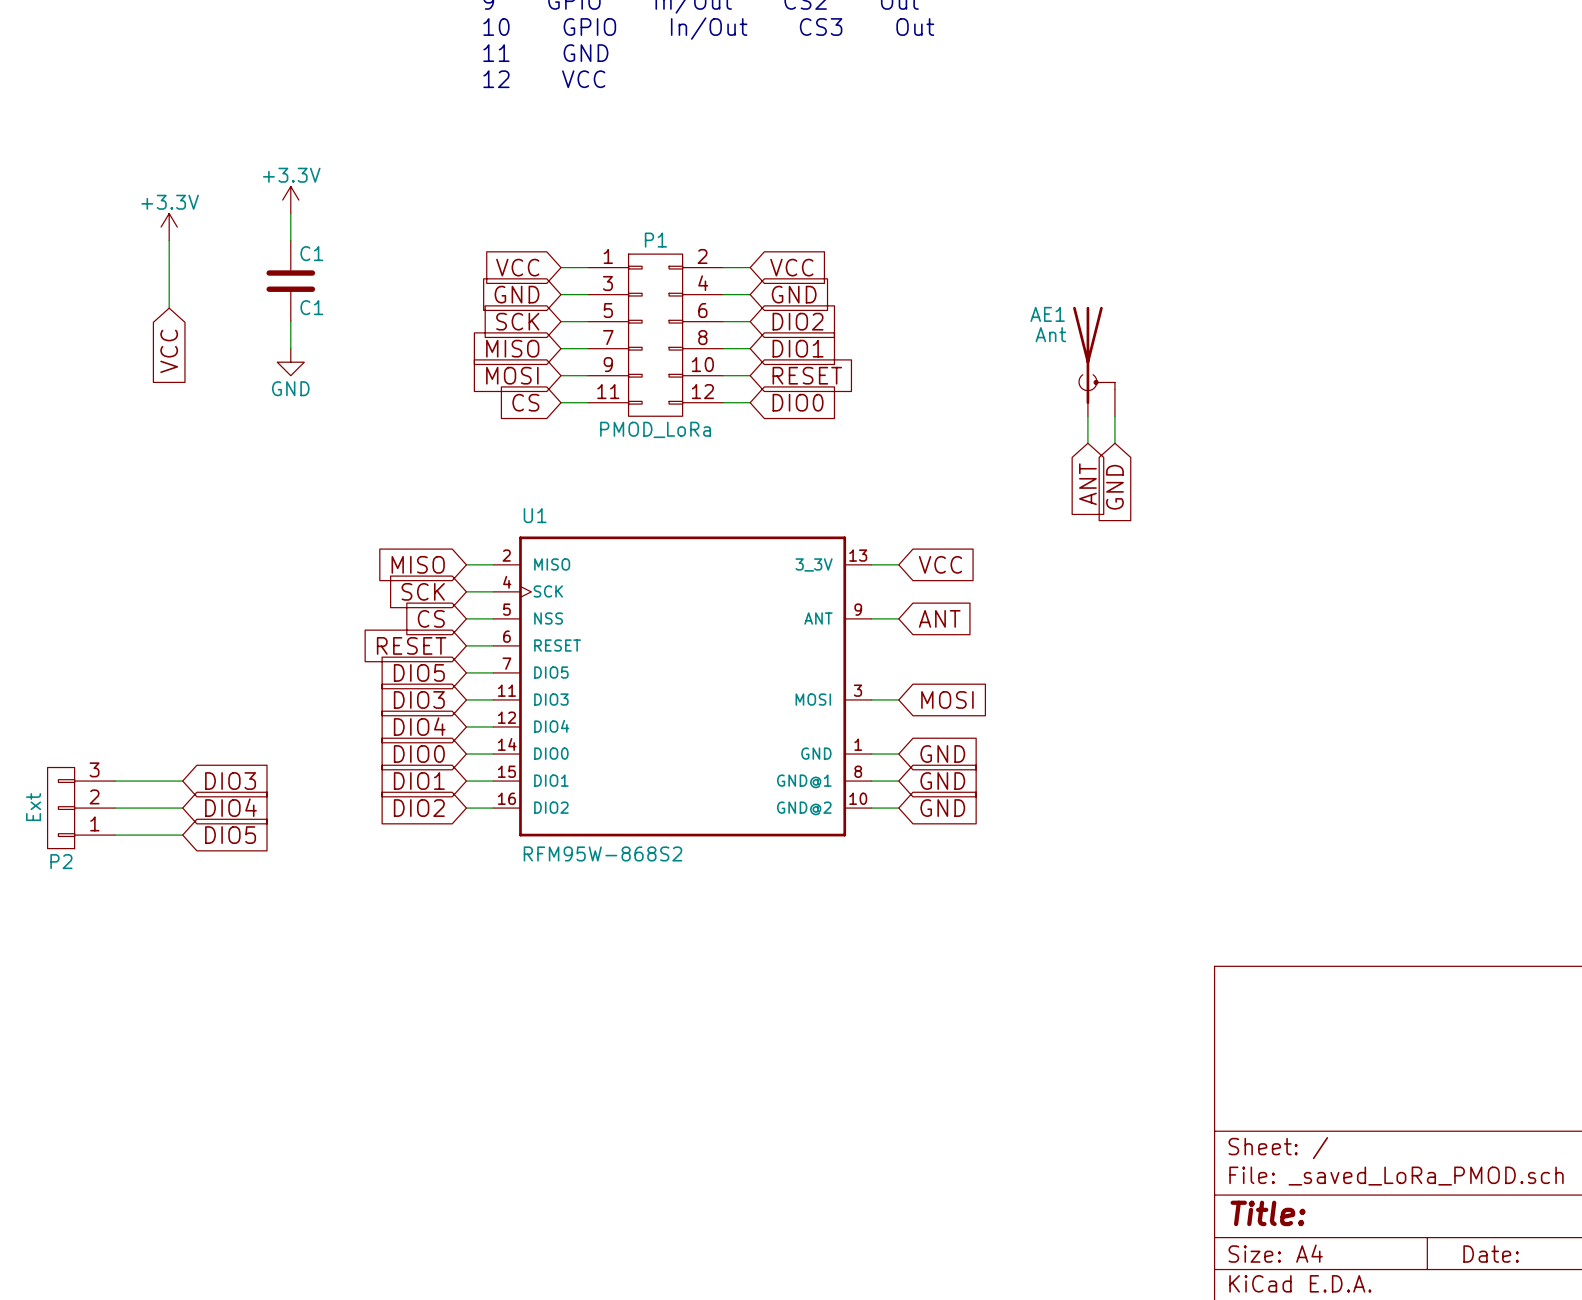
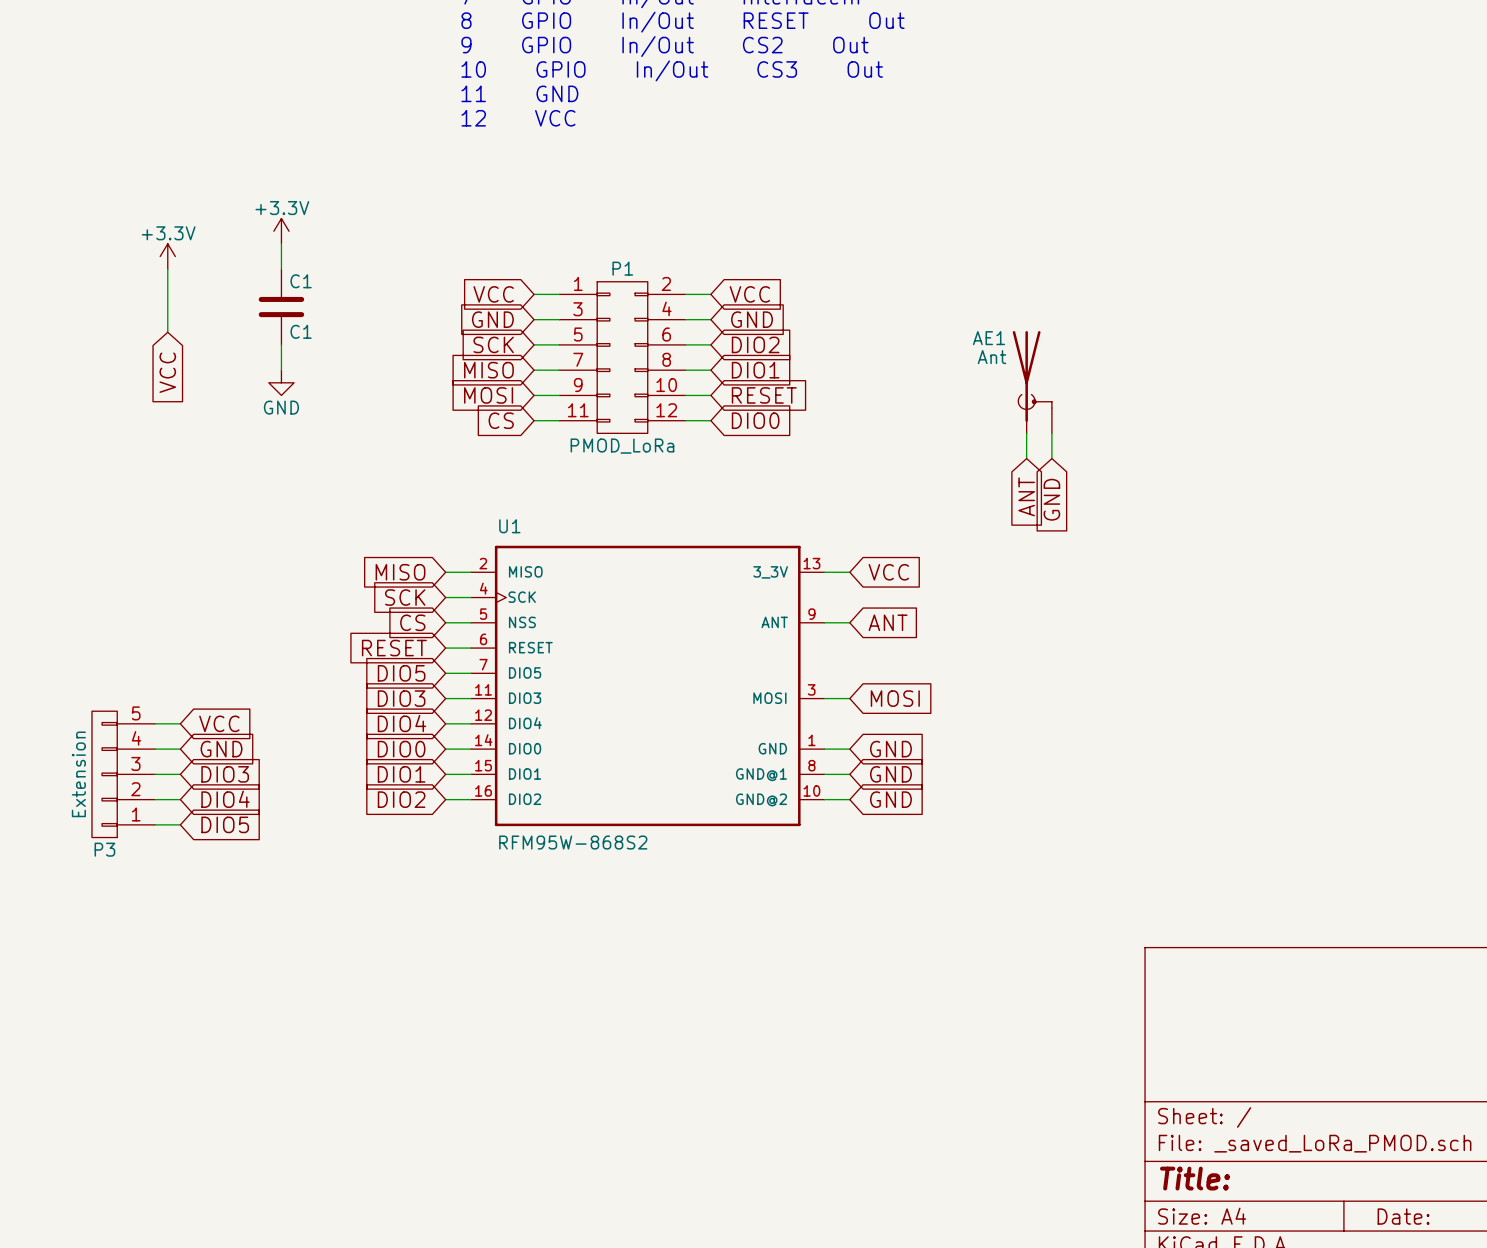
wire: none -> (155, 723) (180, 723)
global label: none -> VCC (219, 723)
wire: none -> (155, 749) (180, 749)
global label: none -> GND (221, 749)
P3: none -> Extension (123, 774)
P2: Ext (81, 808) -> none

